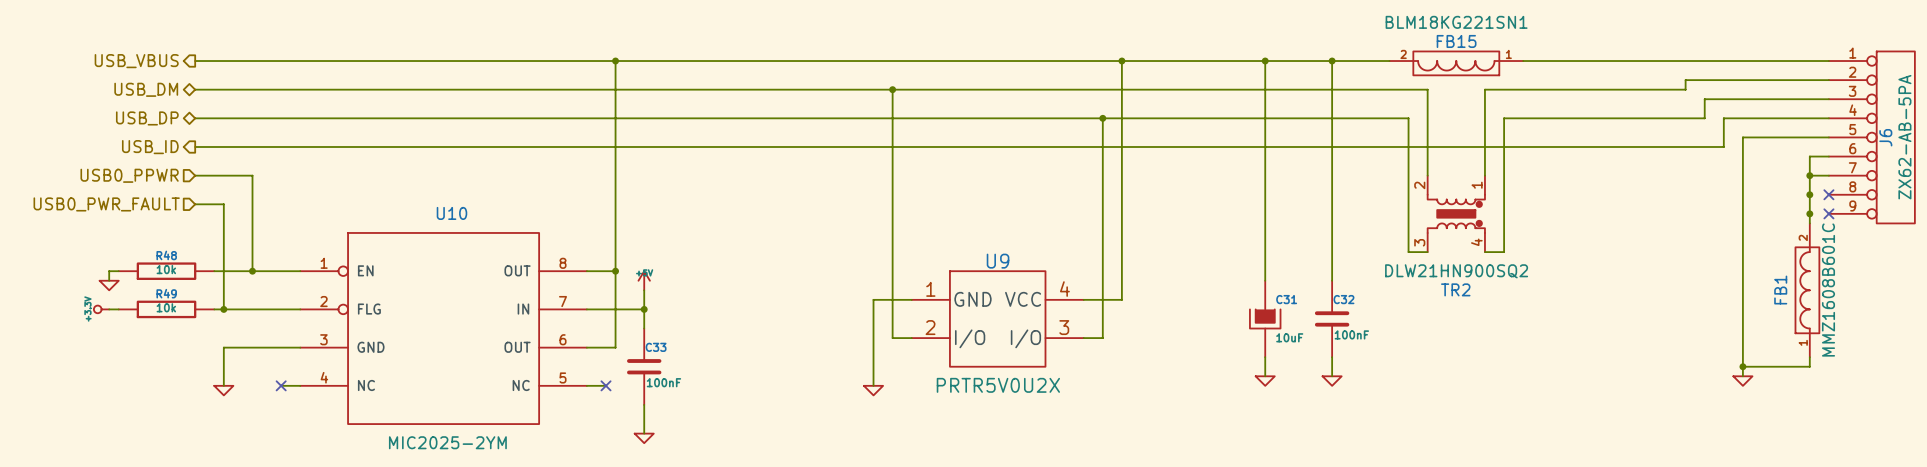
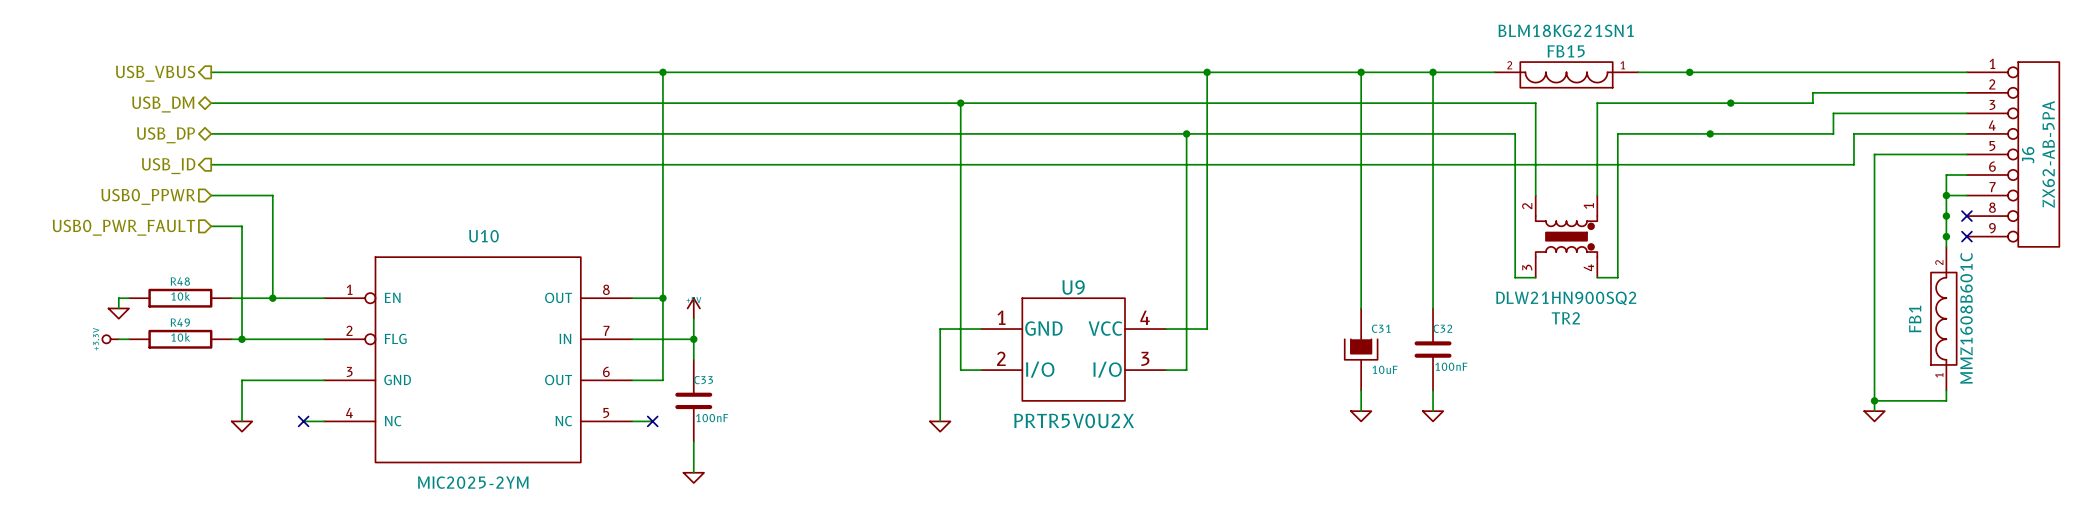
junction: none -> (1689, 72)
junction: none -> (1730, 103)
junction: none -> (1710, 133)

